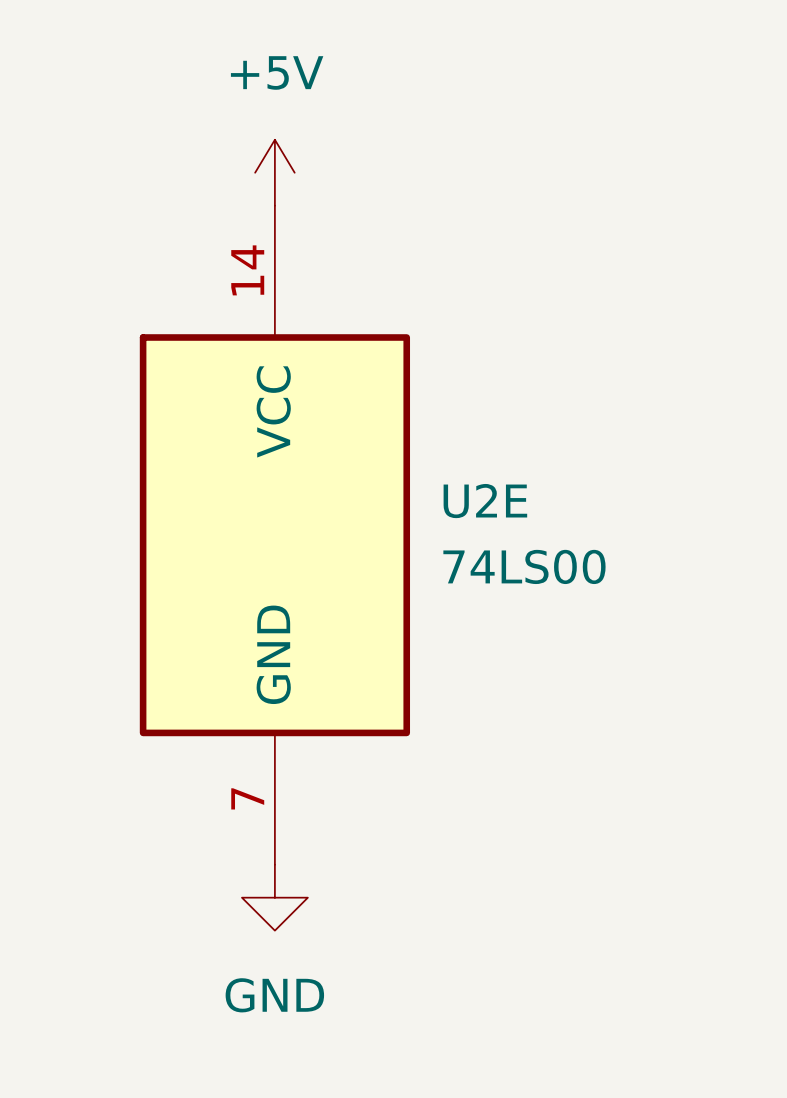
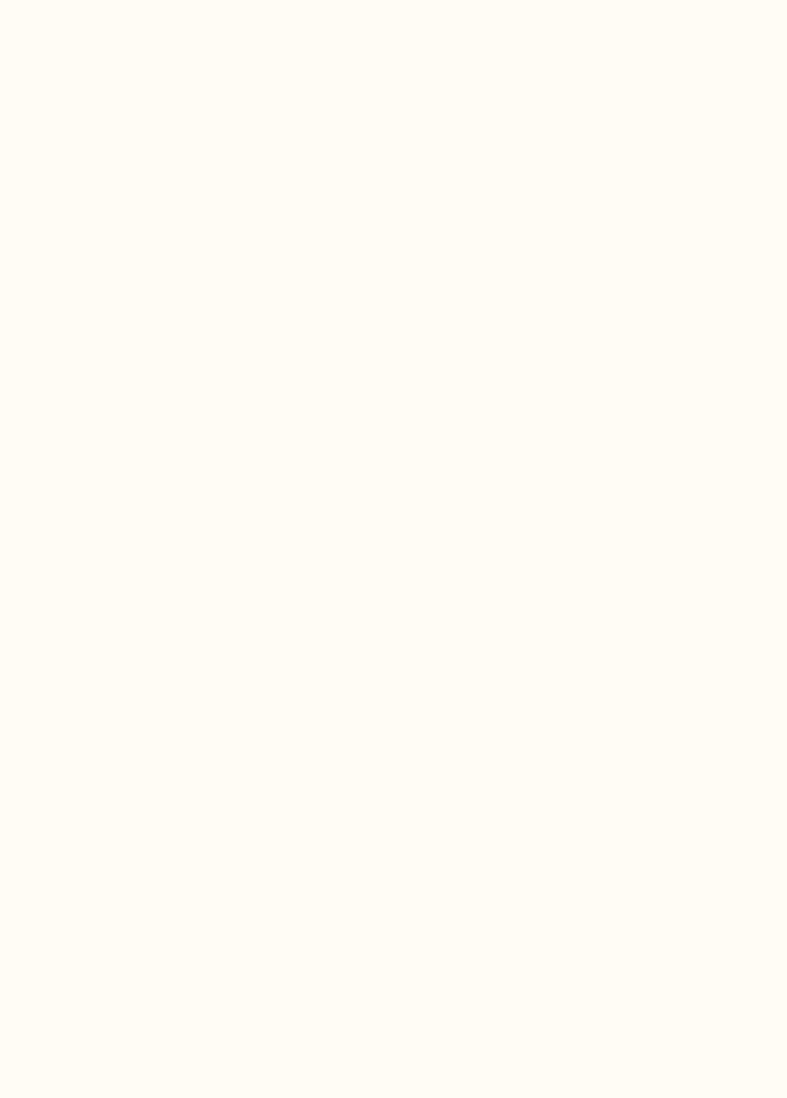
power symbol: +5V (274, 172) -> none
U2E: 74LS00 (274, 535) -> none
power symbol: GND (274, 897) -> none

